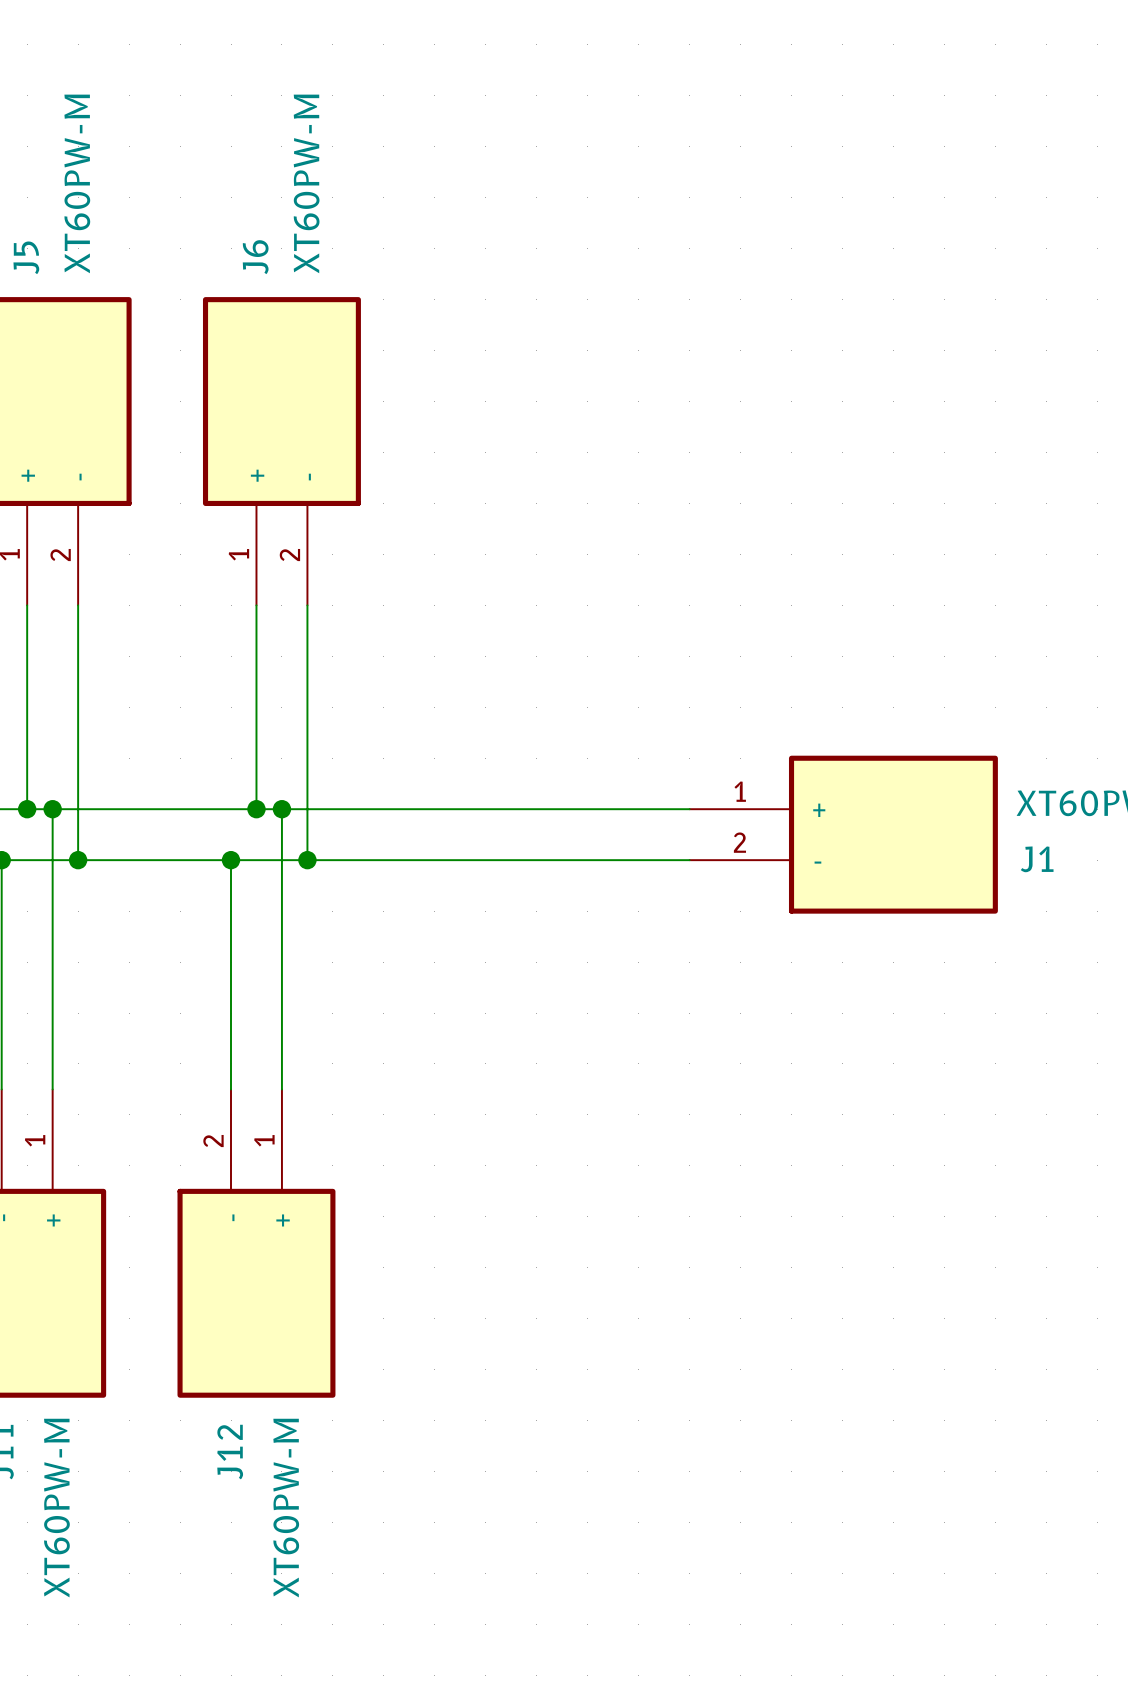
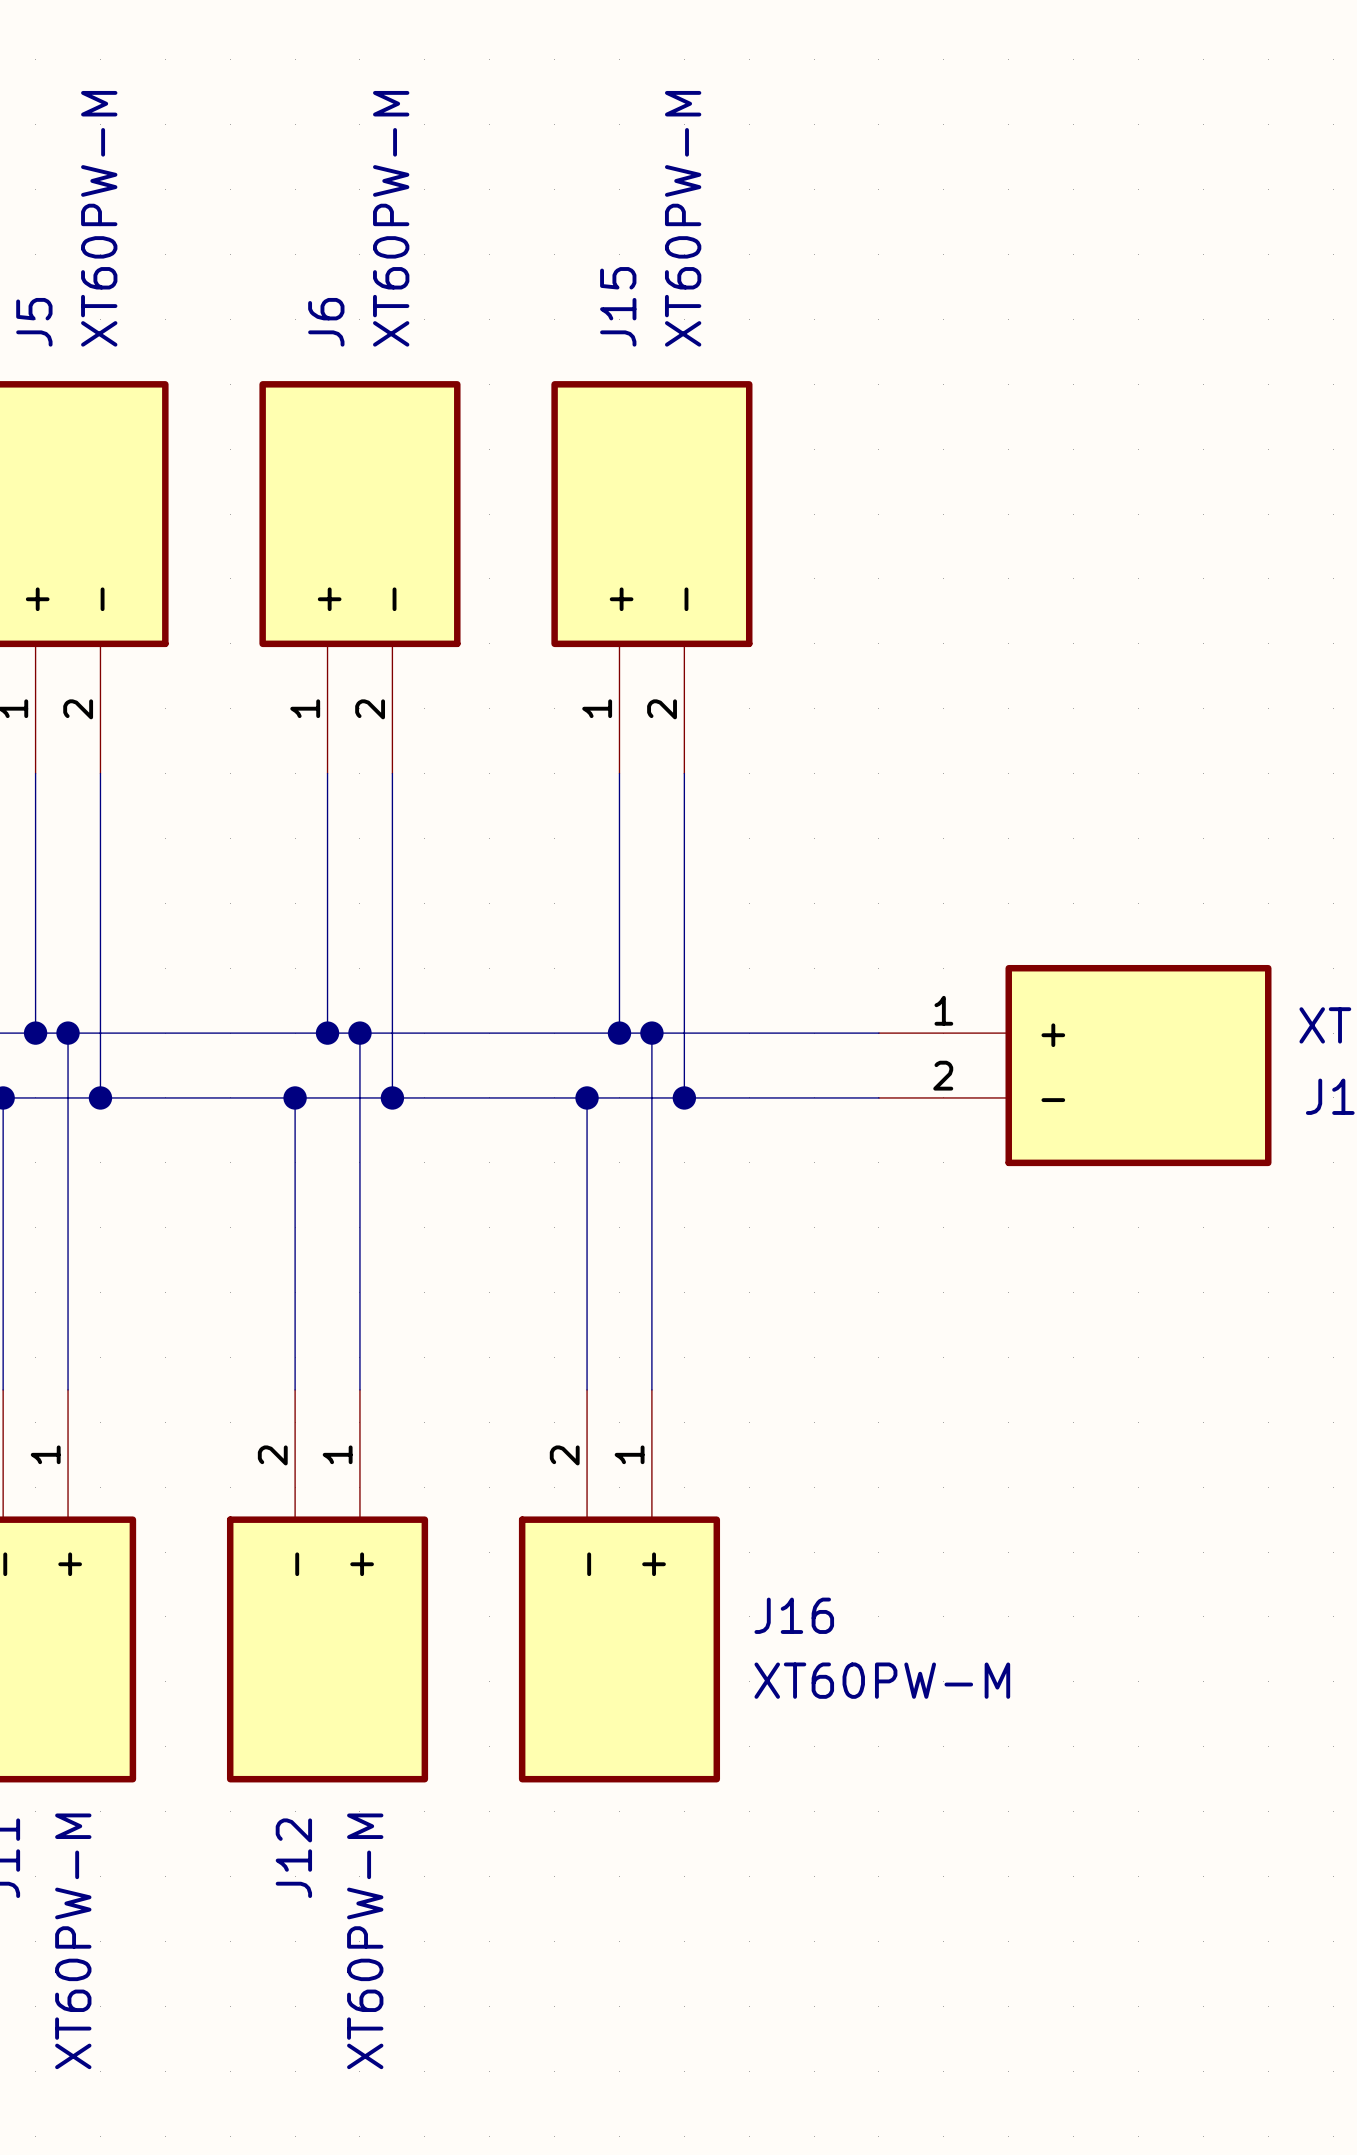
J15: none -> XT60PW-M (651, 577)
wire: none -> (619, 773) (619, 1033)
wire: none -> (684, 773) (684, 1097)
junction: none -> (619, 1033)
wire: none -> (651, 1033) (651, 1389)
junction: none -> (651, 1033)
wire: none -> (587, 1097) (587, 1389)
junction: none -> (587, 1097)
junction: none -> (684, 1097)
J16: none -> XT60PW-M (619, 1586)

